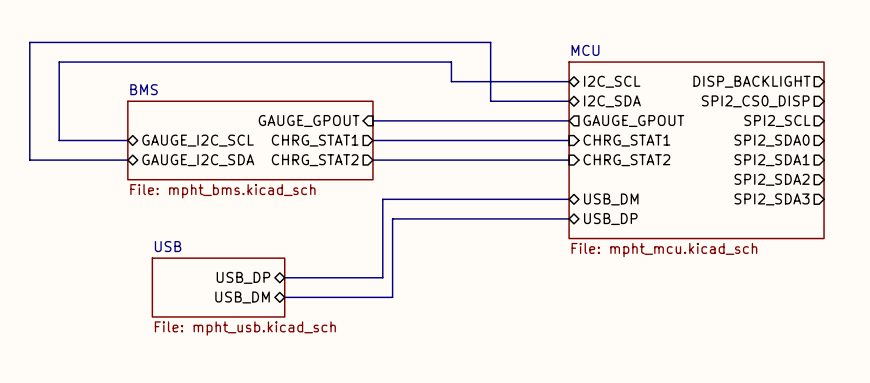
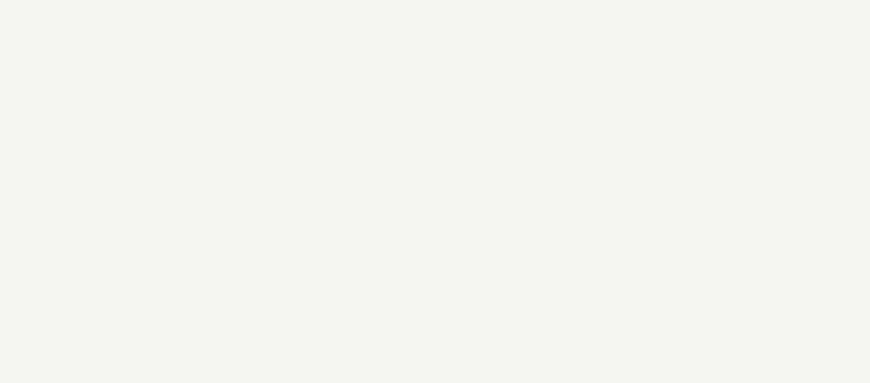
wire: (569, 81) (451, 81) (451, 62) (59, 62) (59, 140) (127, 140) -> none
sheet pin: I2C_SCL (612, 81) -> none
sheet pin: DISP_BACKLIGHT (751, 81) -> none
wire: (569, 101) (490, 101) (490, 42) (29, 42) (29, 160) (127, 160) -> none
sheet pin: I2C_SDA (612, 101) -> none
sheet pin: SPI2_CS0_DISP (755, 101) -> none
sheet pin: GAUGE_GPOUT (309, 120) -> none
wire: (372, 120) (569, 120) -> none
sheet pin: GAUGE_GPOUT (633, 120) -> none
sheet pin: SPI2_SCL (777, 120) -> none
sheet pin: GAUGE_I2C_SCL (198, 140) -> none
sheet BMS: File: mpht_bms.kicad_sch (250, 140) -> none
sheet pin: CHRG_STAT1 (315, 140) -> none
wire: (372, 140) (569, 140) -> none
sheet pin: CHRG_STAT1 (626, 140) -> none
sheet pin: SPI2_SDA0 (772, 140) -> none
sheet MCU: File: mpht_mcu.kicad_sch (696, 150) -> none
sheet pin: GAUGE_I2C_SDA (198, 160) -> none
sheet pin: CHRG_STAT2 (315, 160) -> none
wire: (372, 160) (569, 160) -> none
sheet pin: CHRG_STAT2 (626, 160) -> none
sheet pin: SPI2_SDA1 (772, 160) -> none
sheet pin: SPI2_SDA2 (772, 179) -> none
wire: (569, 199) (382, 199) (382, 277) (284, 277) -> none
sheet pin: USB_DM (611, 199) -> none
sheet pin: SPI2_SDA3 (772, 199) -> none
wire: (569, 218) (392, 218) (392, 297) (284, 297) -> none
sheet pin: USB_DP (610, 219) -> none
sheet pin: USB_DP (243, 277) -> none
sheet USB: File: mpht_usb.kicad_sch (218, 287) -> none
sheet pin: USB_DM (242, 297) -> none

